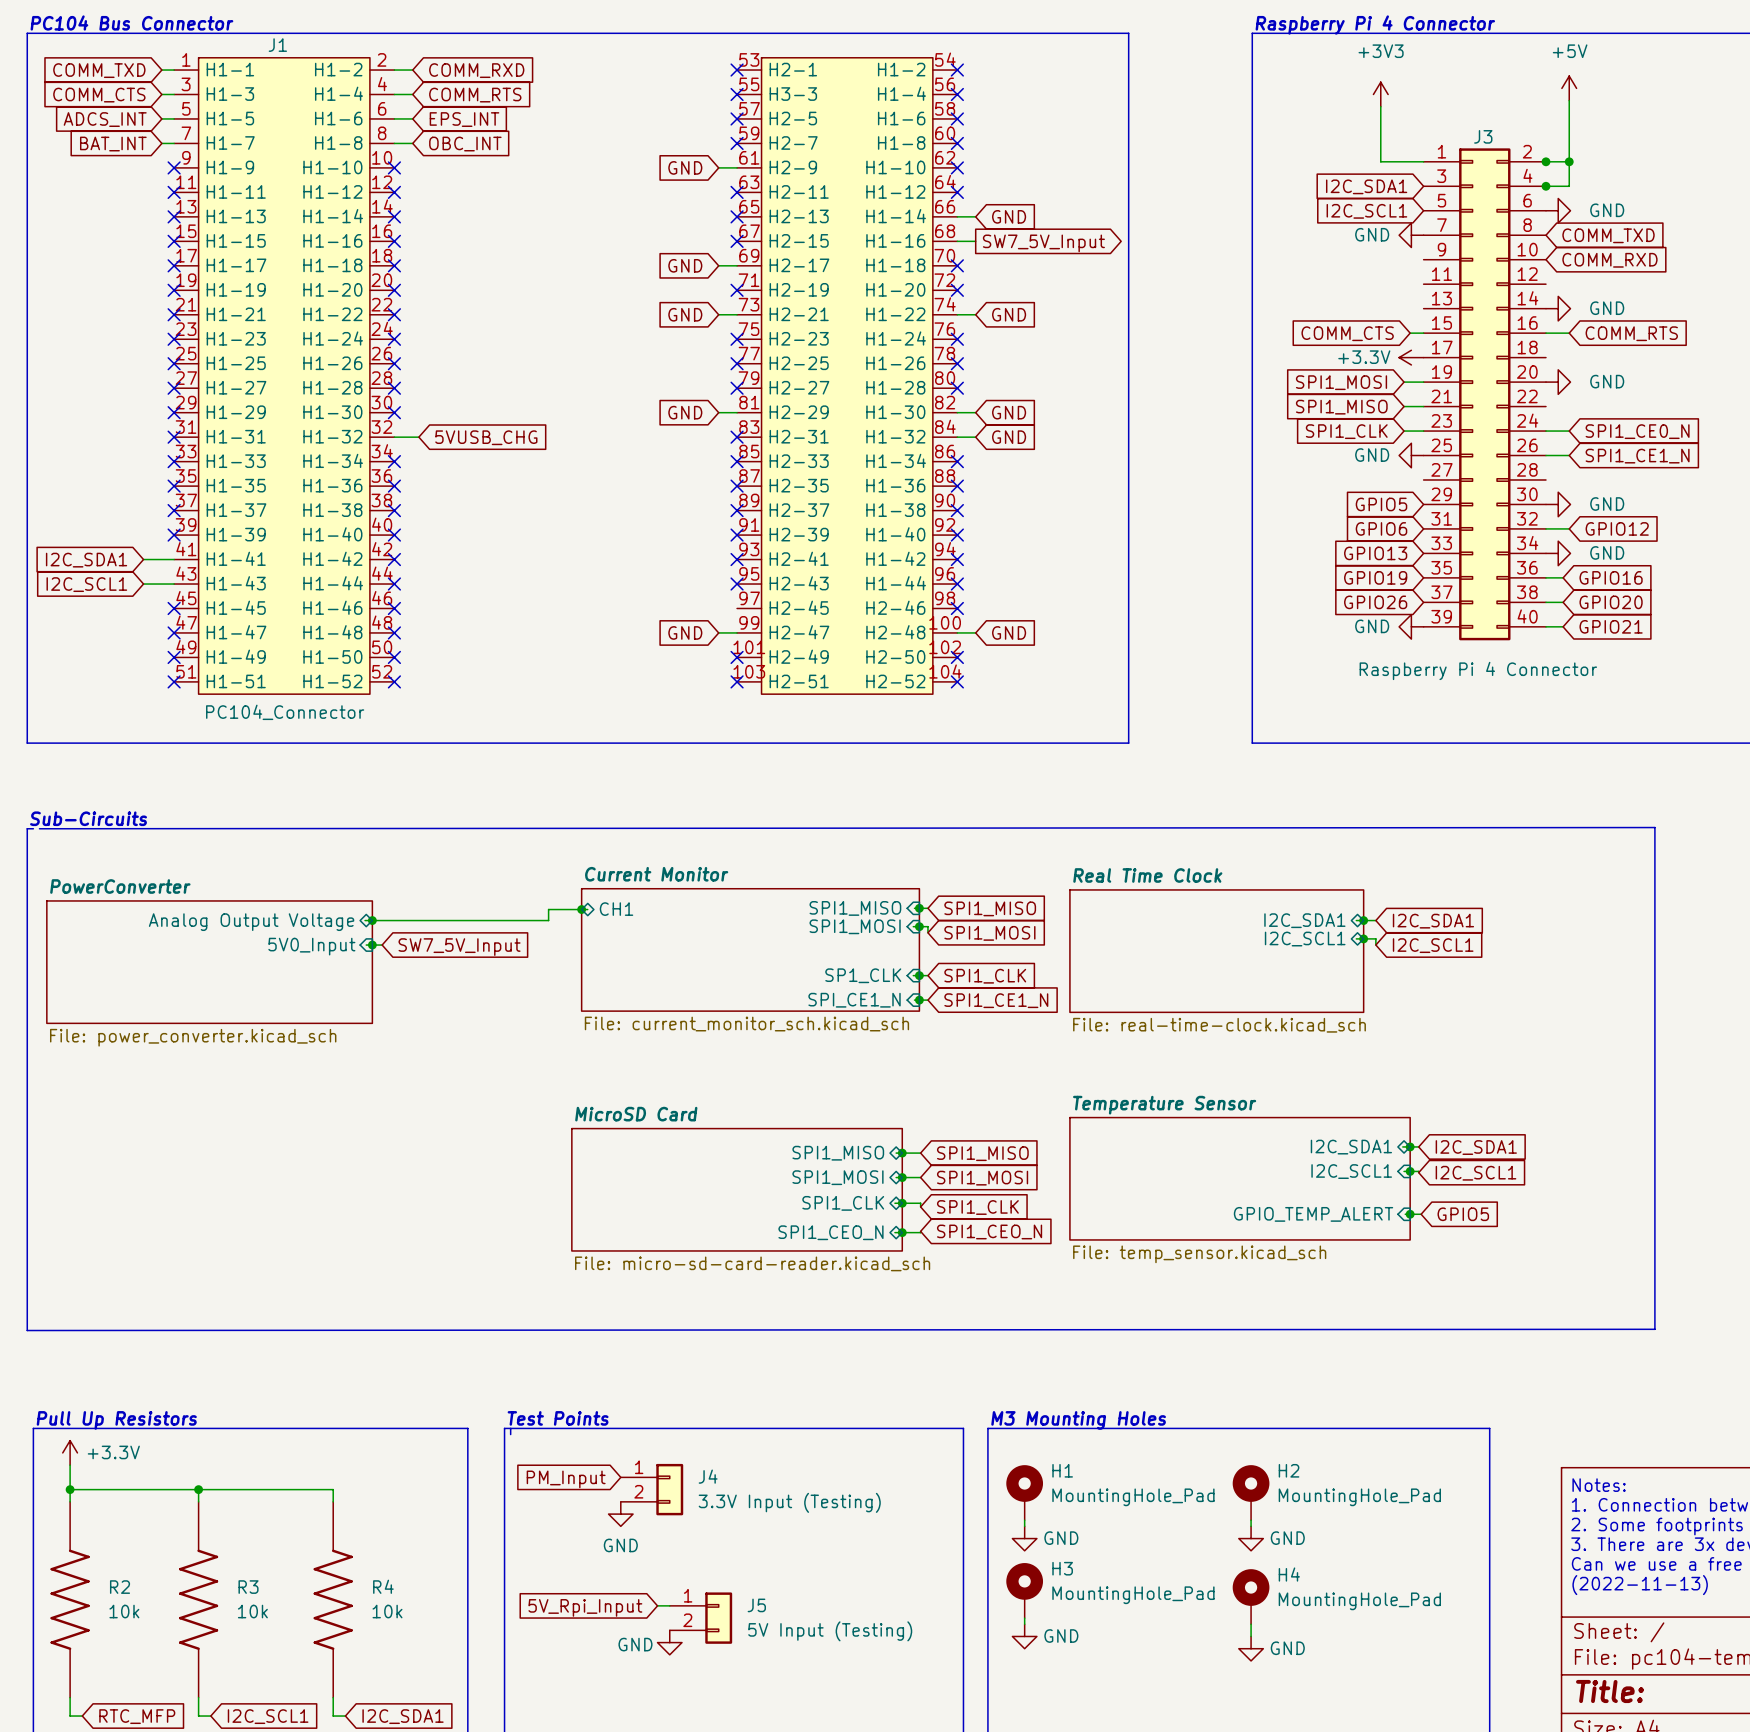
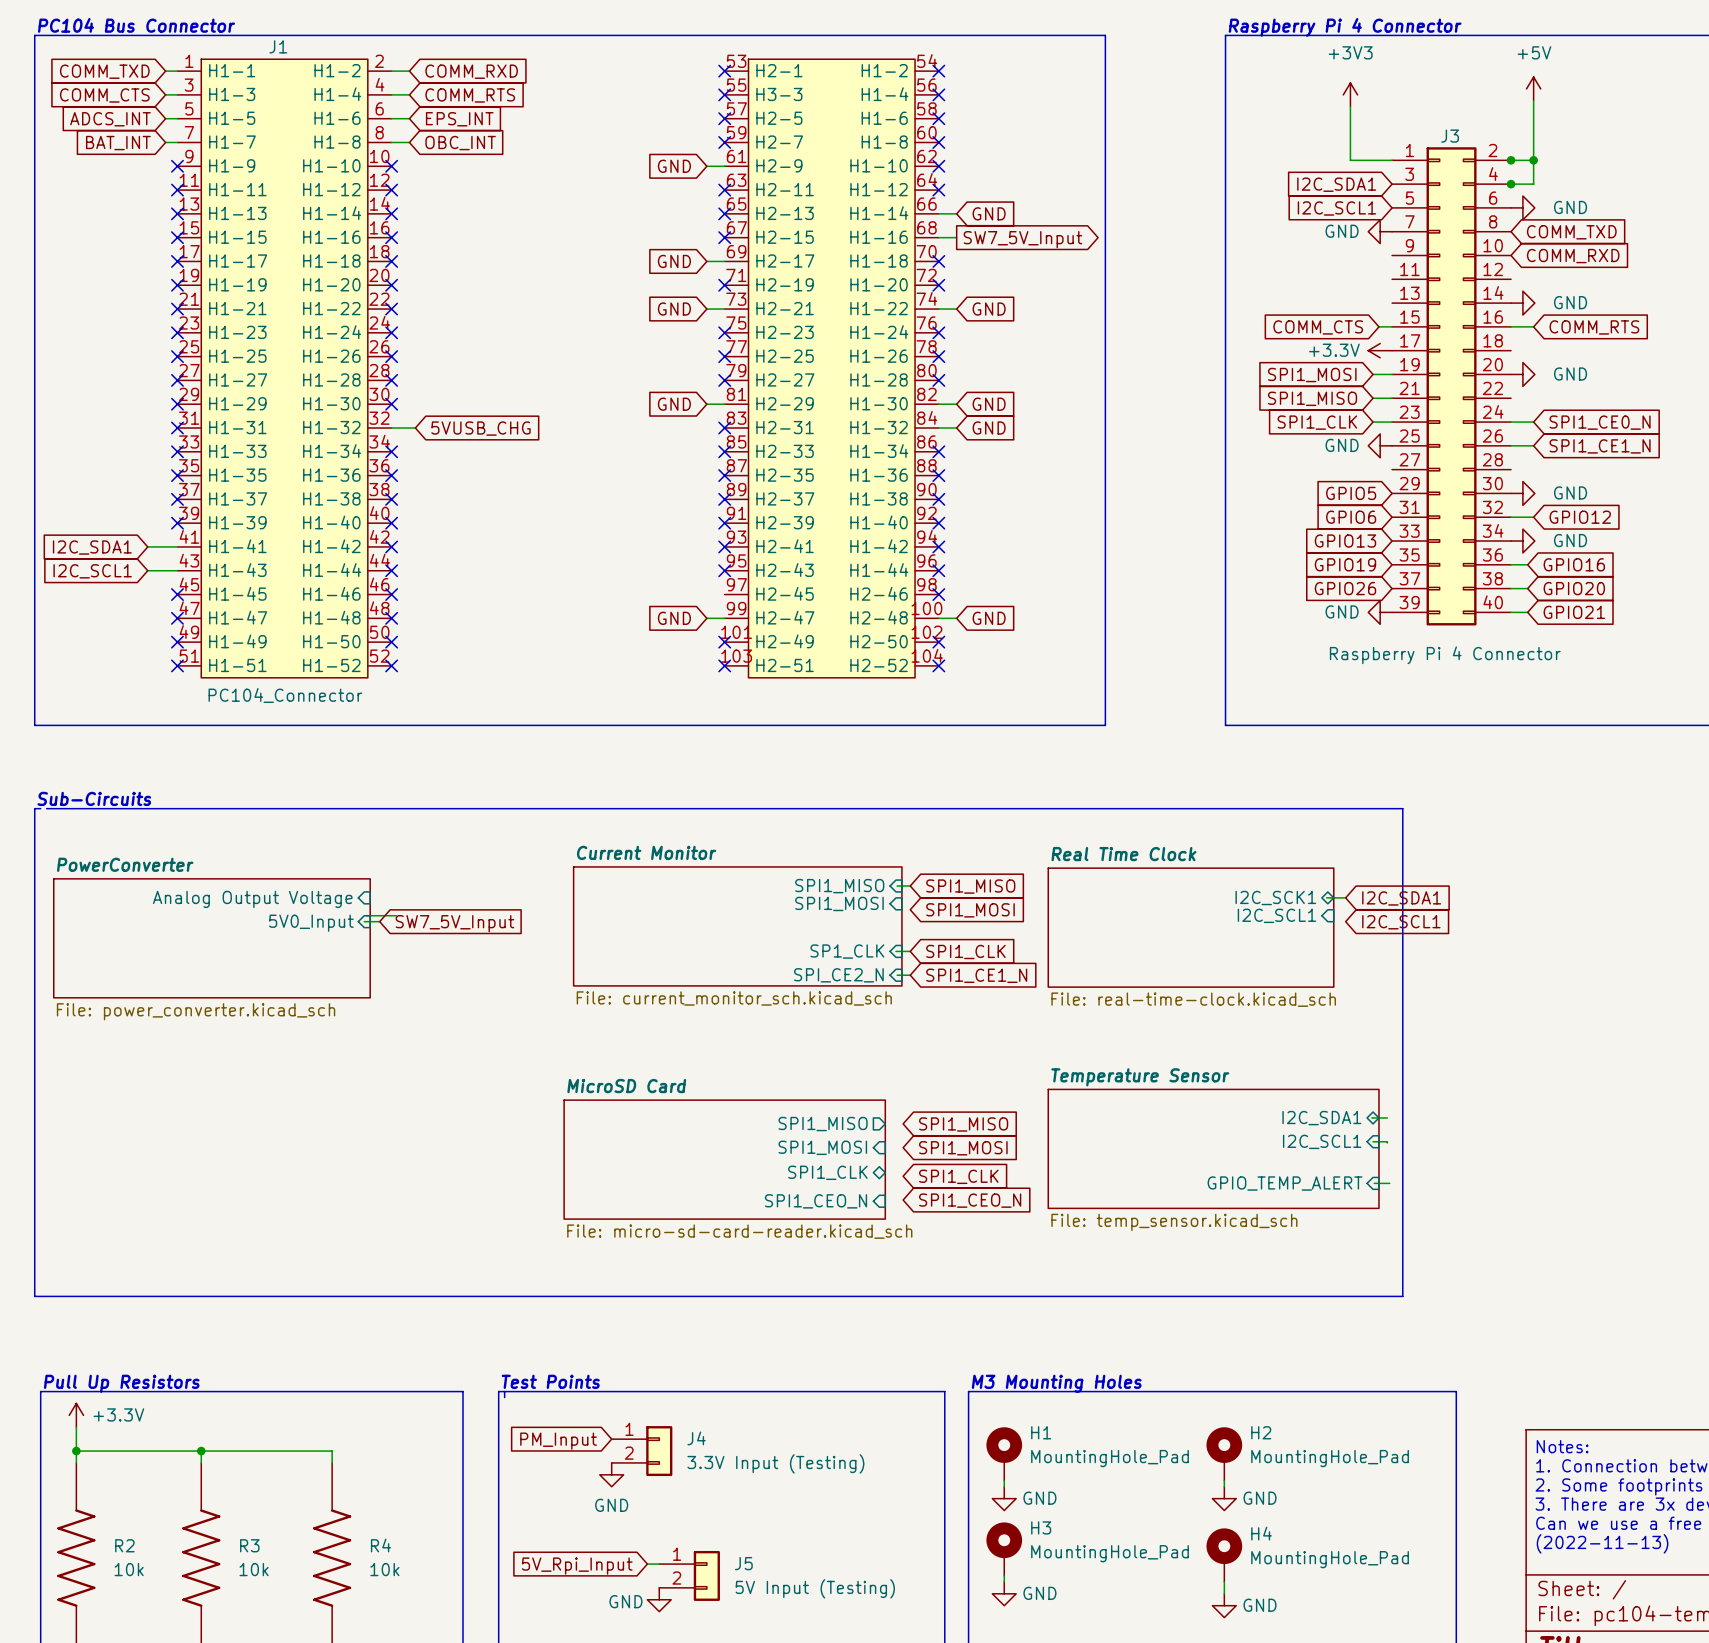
line: (39, 828) (1654, 827) (1654, 1329) (27, 1330) -> (46, 808) (1402, 808) (1402, 1296) (34, 1296)
junction: (919, 908) -> none
junction: (581, 909) -> none
wire: (587, 909) (548, 909) (548, 920) (365, 920) -> none
sheet pin: CH1 (616, 909) -> none
junction: (372, 920) -> none
sheet pin: I2C_SDA1 (1304, 920) -> I2C_SCK1 (1275, 898)
junction: (1363, 920) -> none
sheet pin shape: bidirectional (251, 922) -> input (252, 899)
wire: (913, 926) (927, 926) (927, 932) -> none
junction: (919, 926) -> none
wire: none -> (366, 915) (396, 915)
wire: (1356, 938) (1375, 938) (1375, 945) -> none
junction: (1363, 938) -> none
sheet pin shape: bidirectional (1305, 939) -> input (1276, 915)
junction: (372, 945) -> none
junction: (919, 975) -> none
sheet pin: SPI_CE1_N (854, 1000) -> SPI_CE2_N (838, 975)
junction: (919, 1000) -> none
junction: (1410, 1146) -> none
global label: I2C_SDA1 (1476, 1147) -> none
sheet pin shape: bidirectional (838, 1153) -> output (823, 1124)
wire: (896, 1153) (920, 1153) -> none
junction: (902, 1153) -> none
junction: (1410, 1171) -> none
global label: I2C_SCL1 (1475, 1173) -> none
sheet pin shape: bidirectional (837, 1177) -> input (822, 1147)
wire: (896, 1177) (920, 1177) -> none
junction: (902, 1177) -> none
wire: (894, 1203) (920, 1203) (920, 1206) -> none
junction: (902, 1203) -> none
junction: (1410, 1214) -> none
global label: GPIO5 (1463, 1214) -> none
wire: (920, 1231) (894, 1232) -> none
sheet pin shape: bidirectional (830, 1232) -> input (816, 1201)
junction: (902, 1232) -> none

